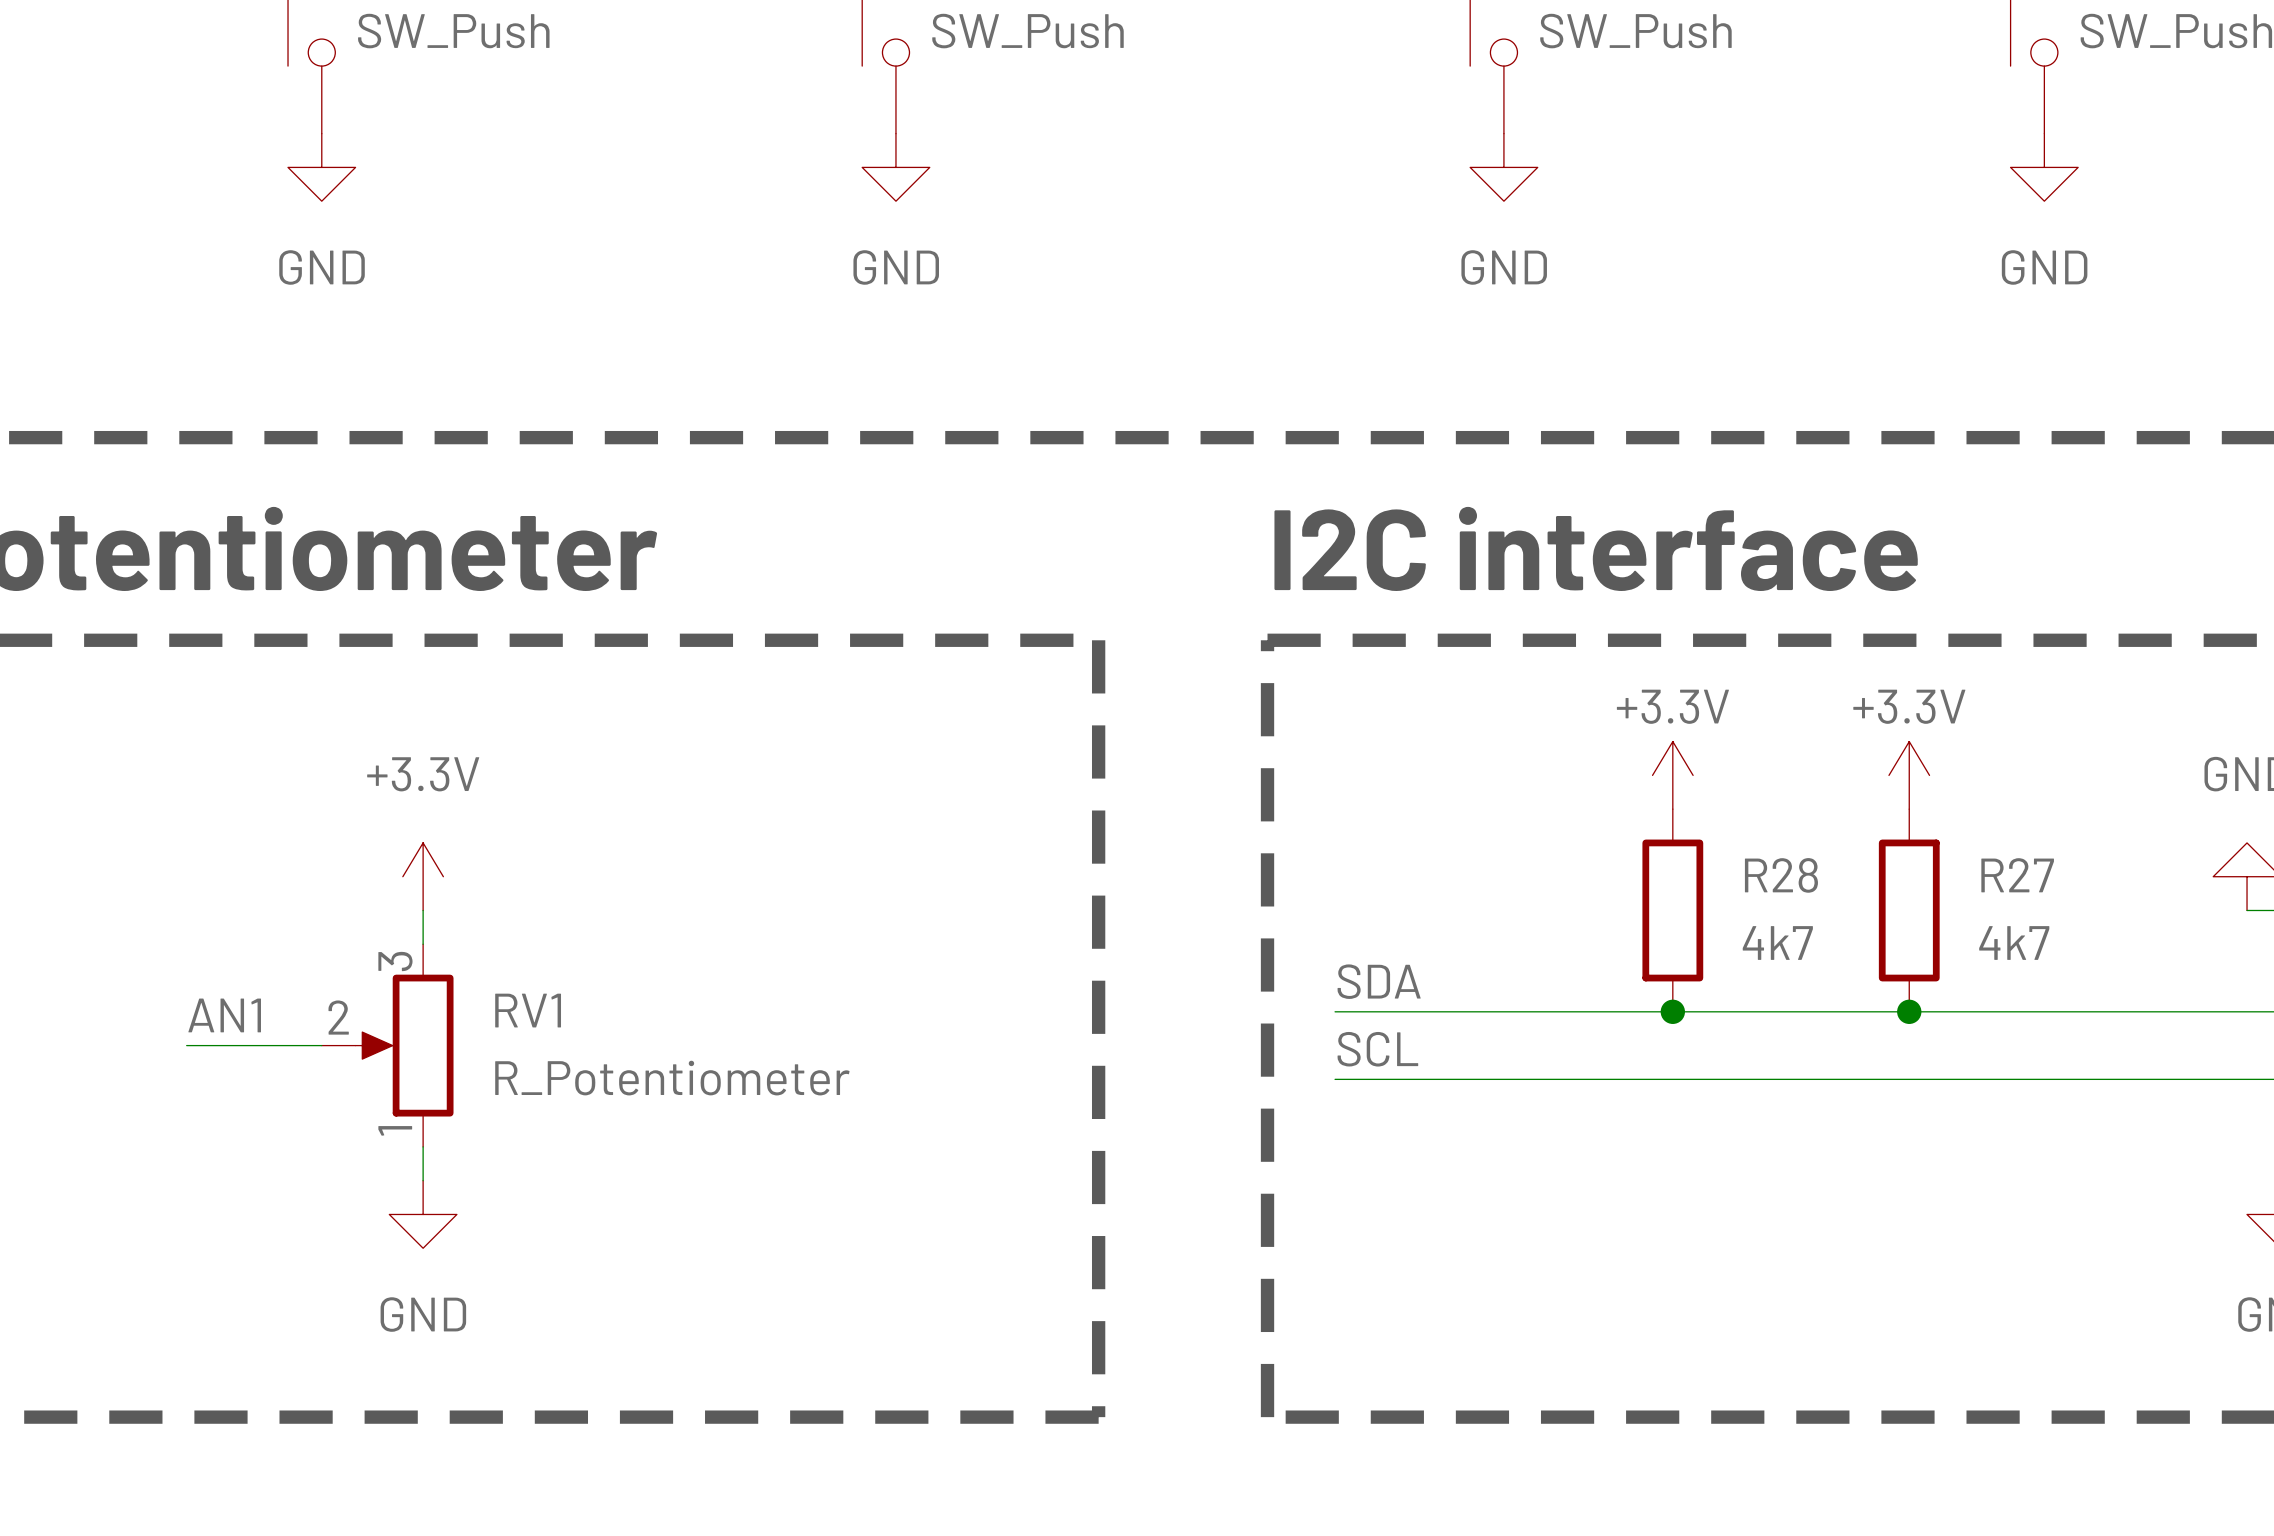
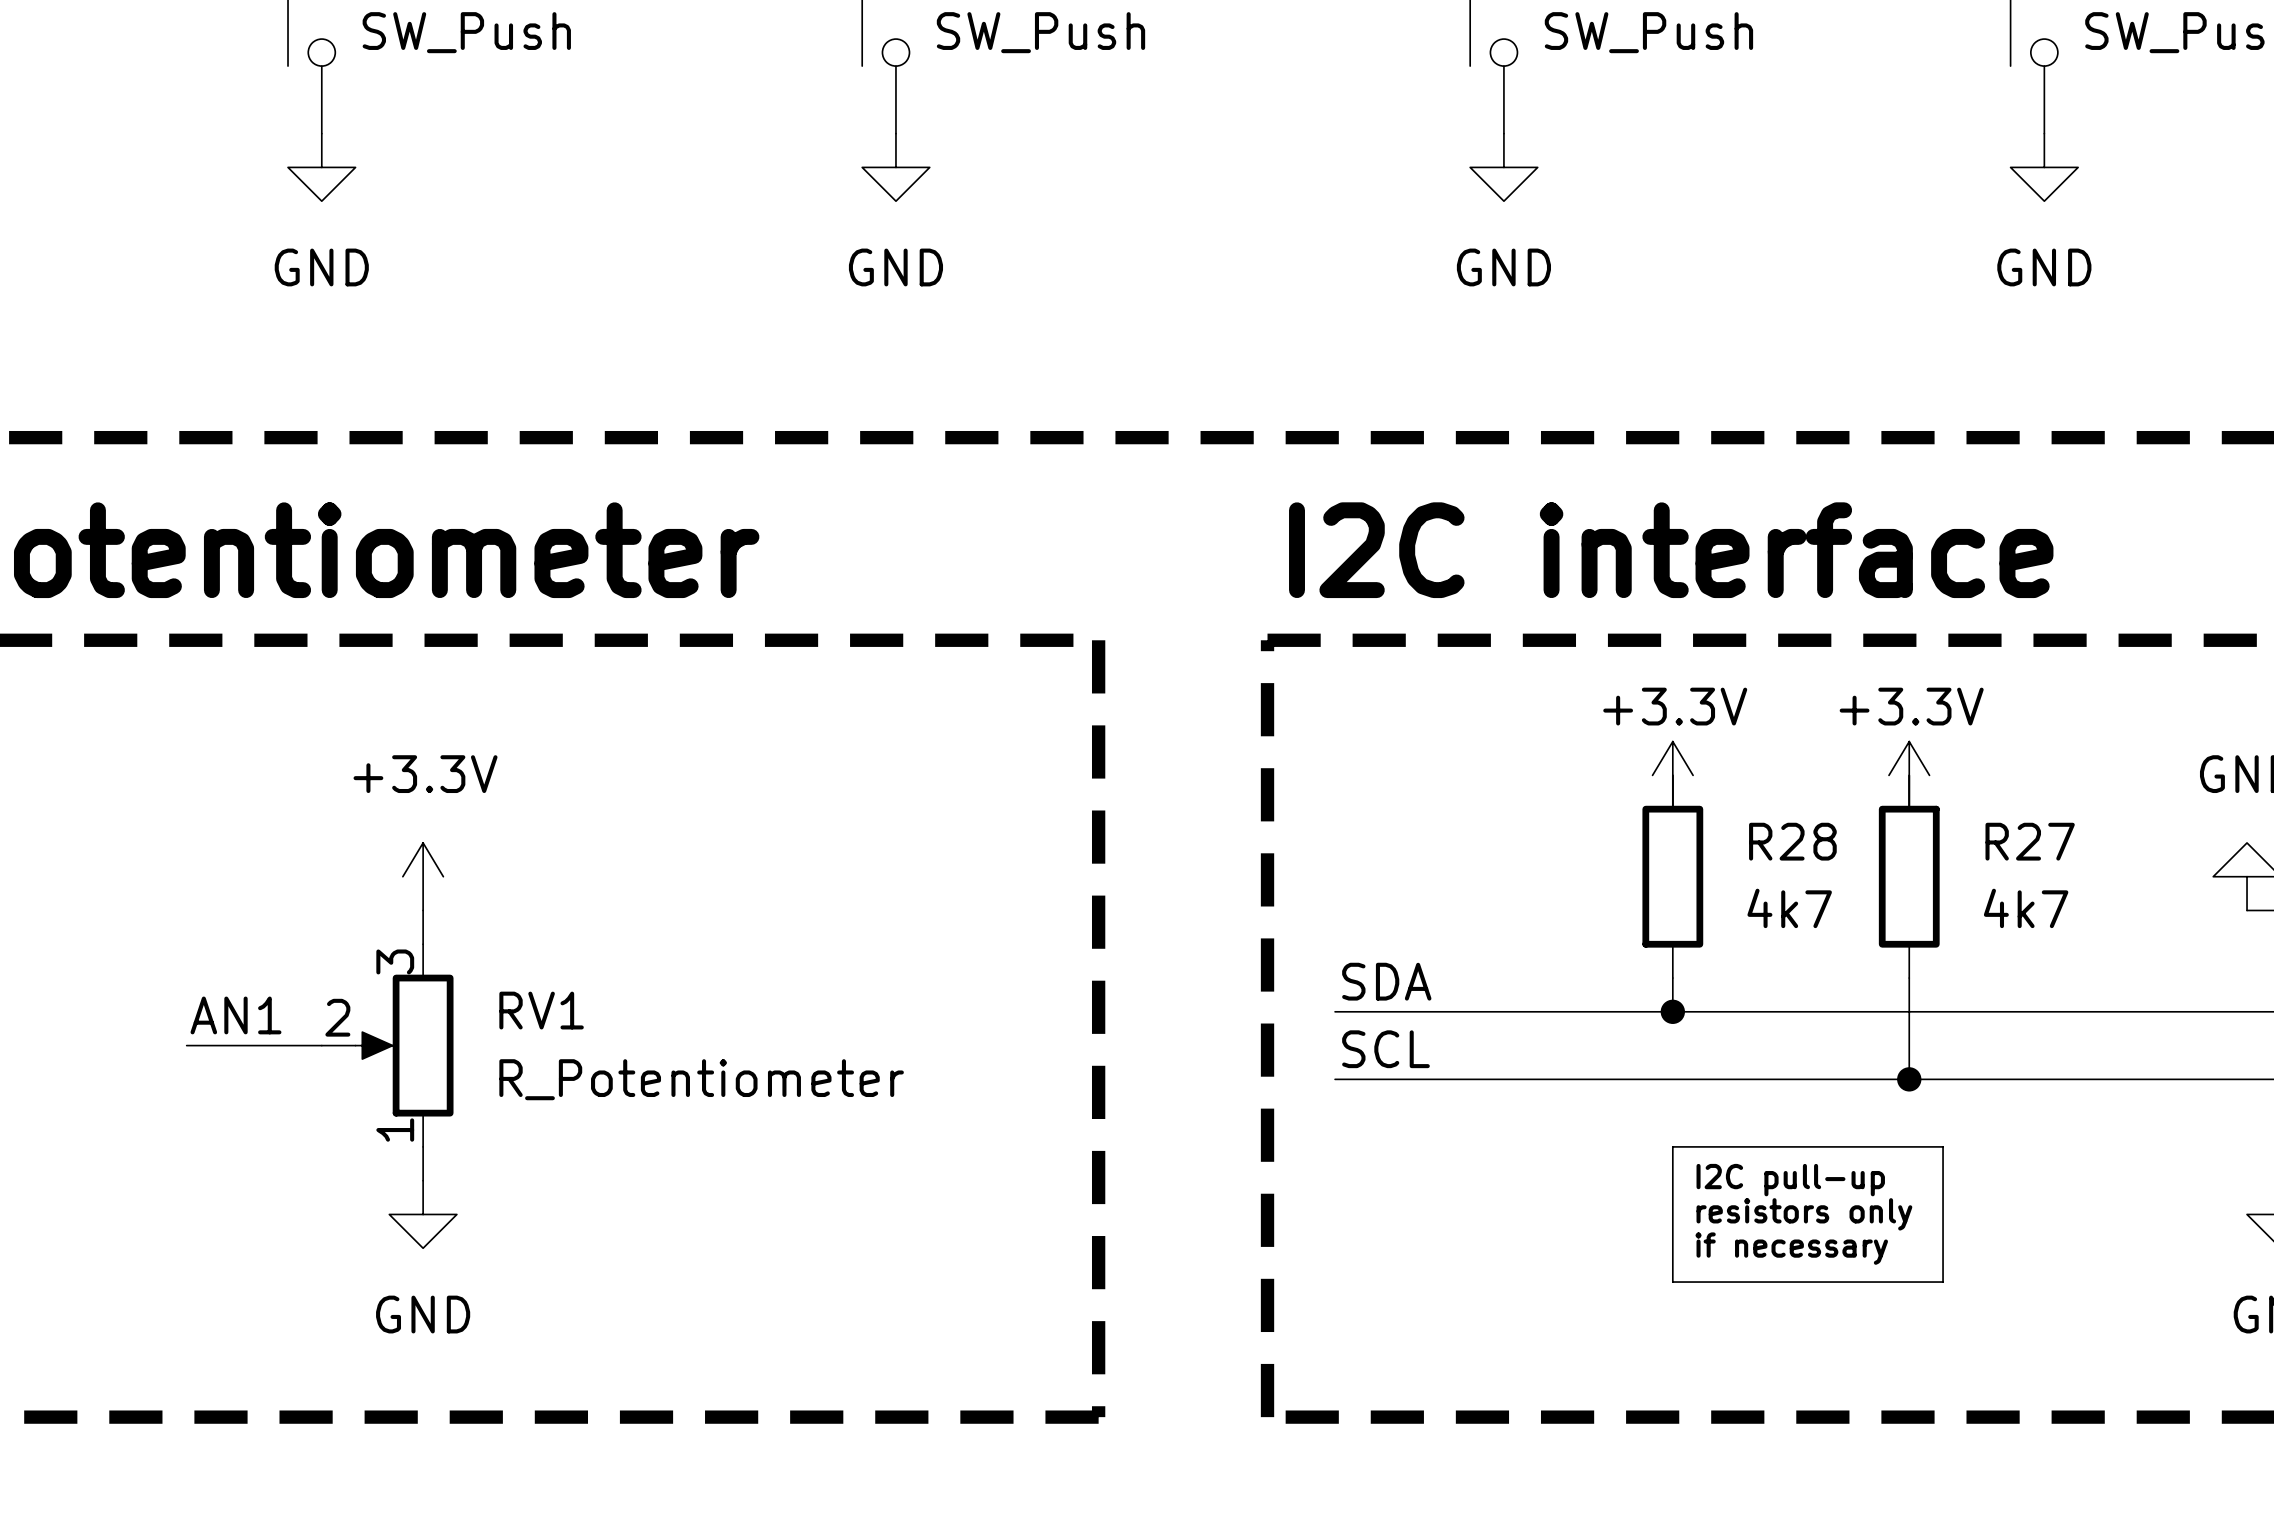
R28 position: (1672, 910) -> (1672, 876)
R27 position: (1909, 910) -> (1909, 876)
wire: none -> (1909, 978) (1909, 1079)
junction position: (1909, 1011) -> (1909, 1079)
line: none -> (1672, 1146) (1943, 1146) (1943, 1282) (1672, 1282) (1672, 1146)
text: none -> I2C pull-up (1790, 1180)
text: none -> resistors only (1804, 1214)
text: none -> if necessary (1791, 1248)

